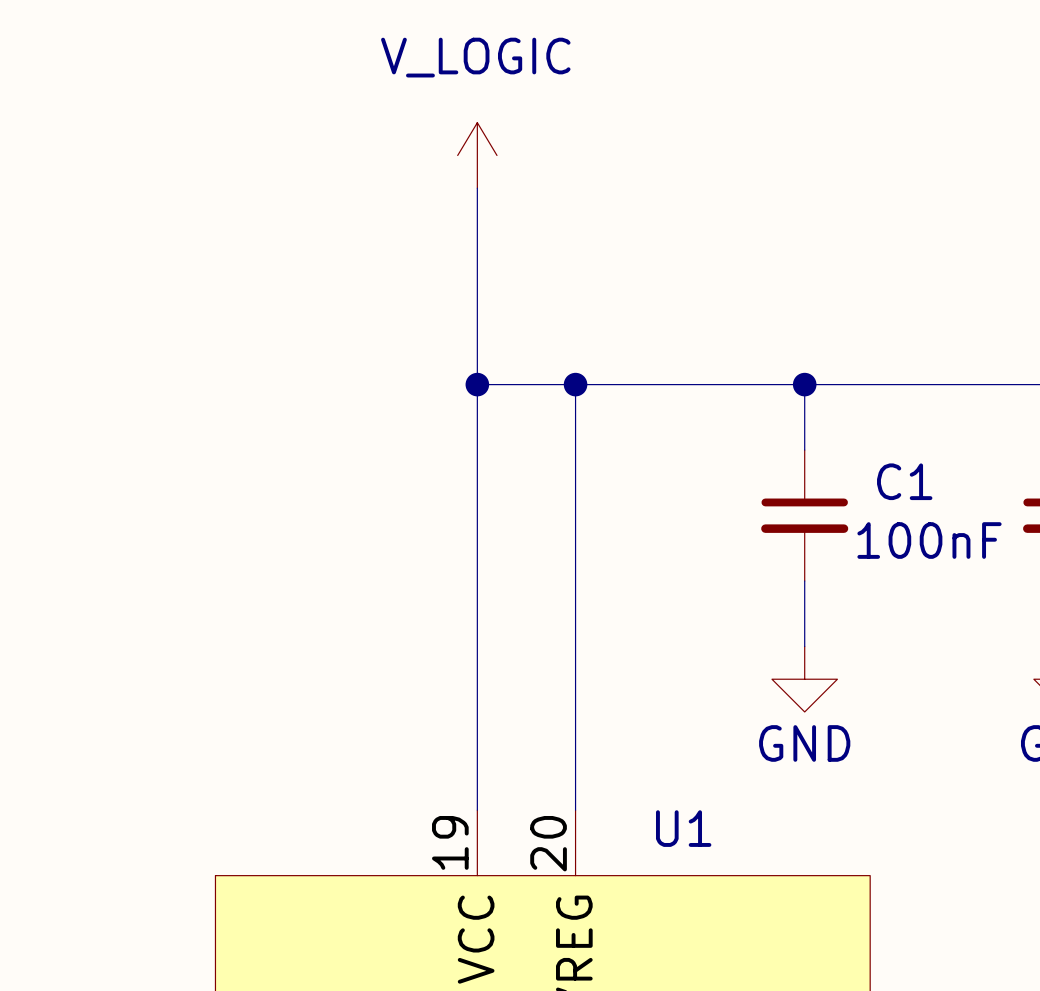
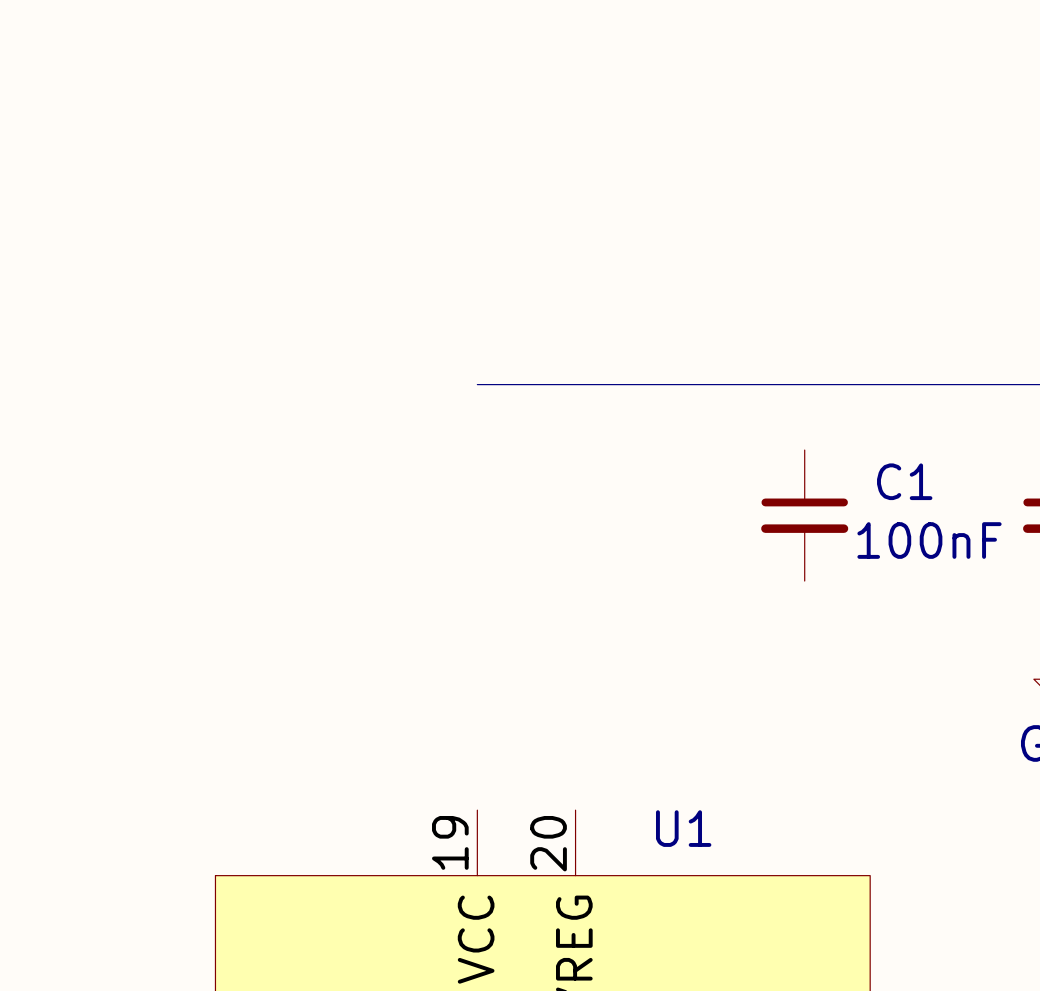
power symbol: V_LOGIC (477, 155) -> none
wire: (477, 188) (477, 810) -> none
junction: (477, 384) -> none
wire: (575, 384) (575, 810) -> none
junction: (575, 384) -> none
wire: (804, 384) (804, 450) -> none
junction: (804, 384) -> none
wire: (804, 581) (804, 646) -> none
power symbol: GND (804, 679) -> none

